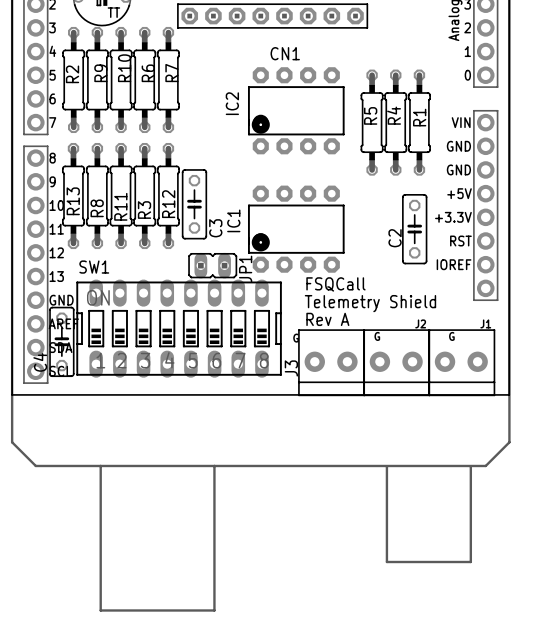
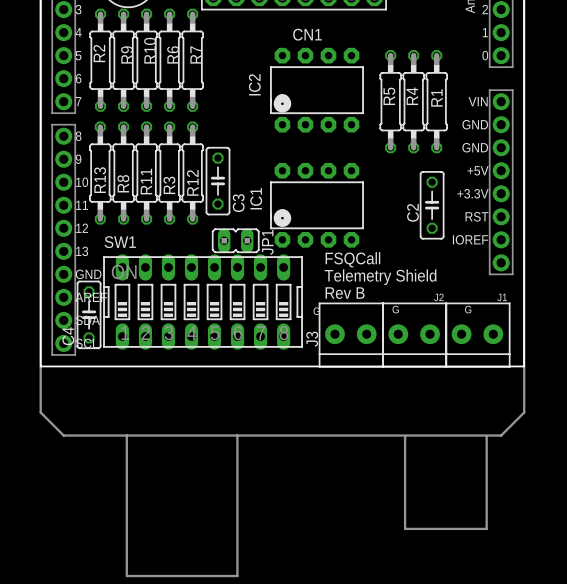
text: Rev A (327, 319) -> Rev B (345, 293)

